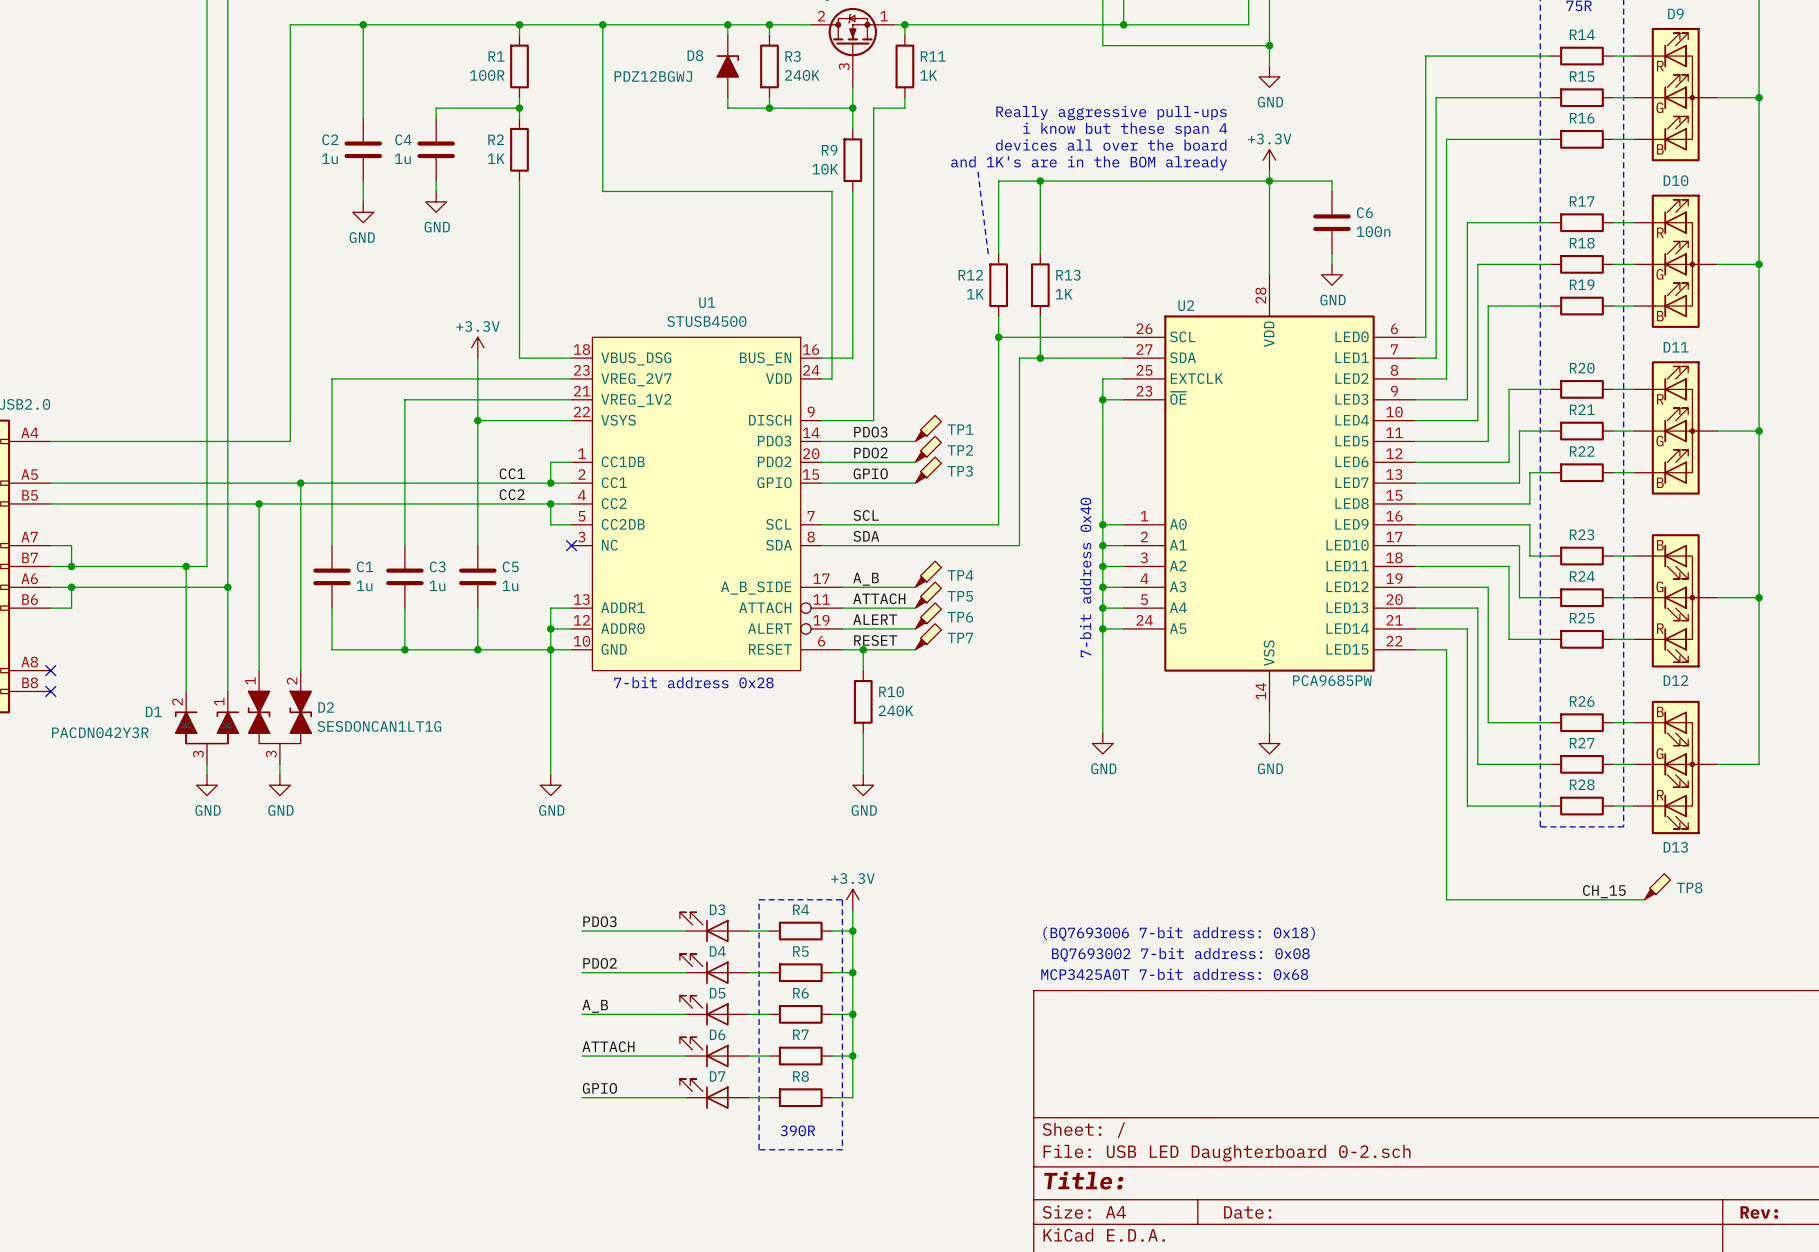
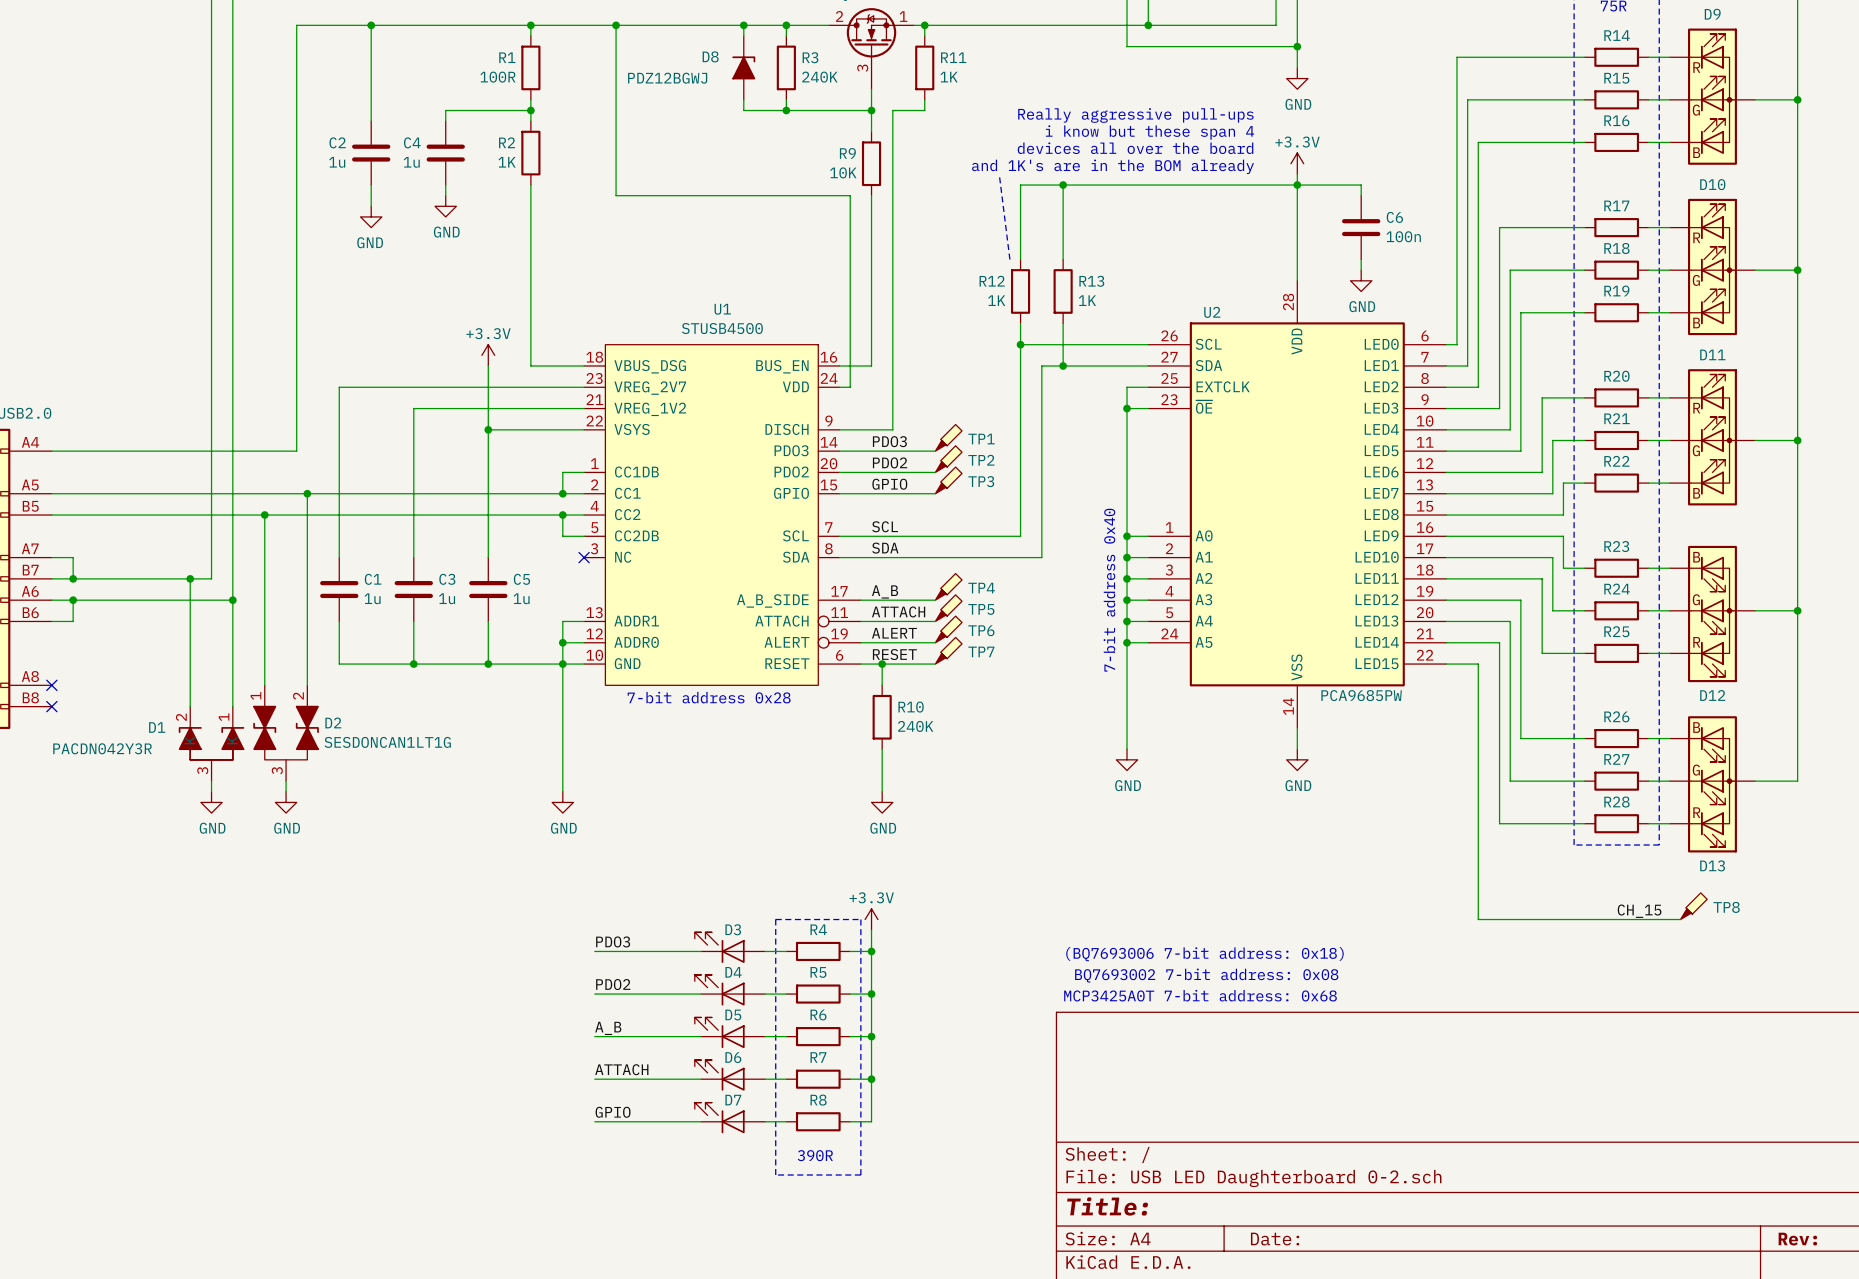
label: CC1 (512, 473) -> none
label: CC2 (512, 494) -> none

